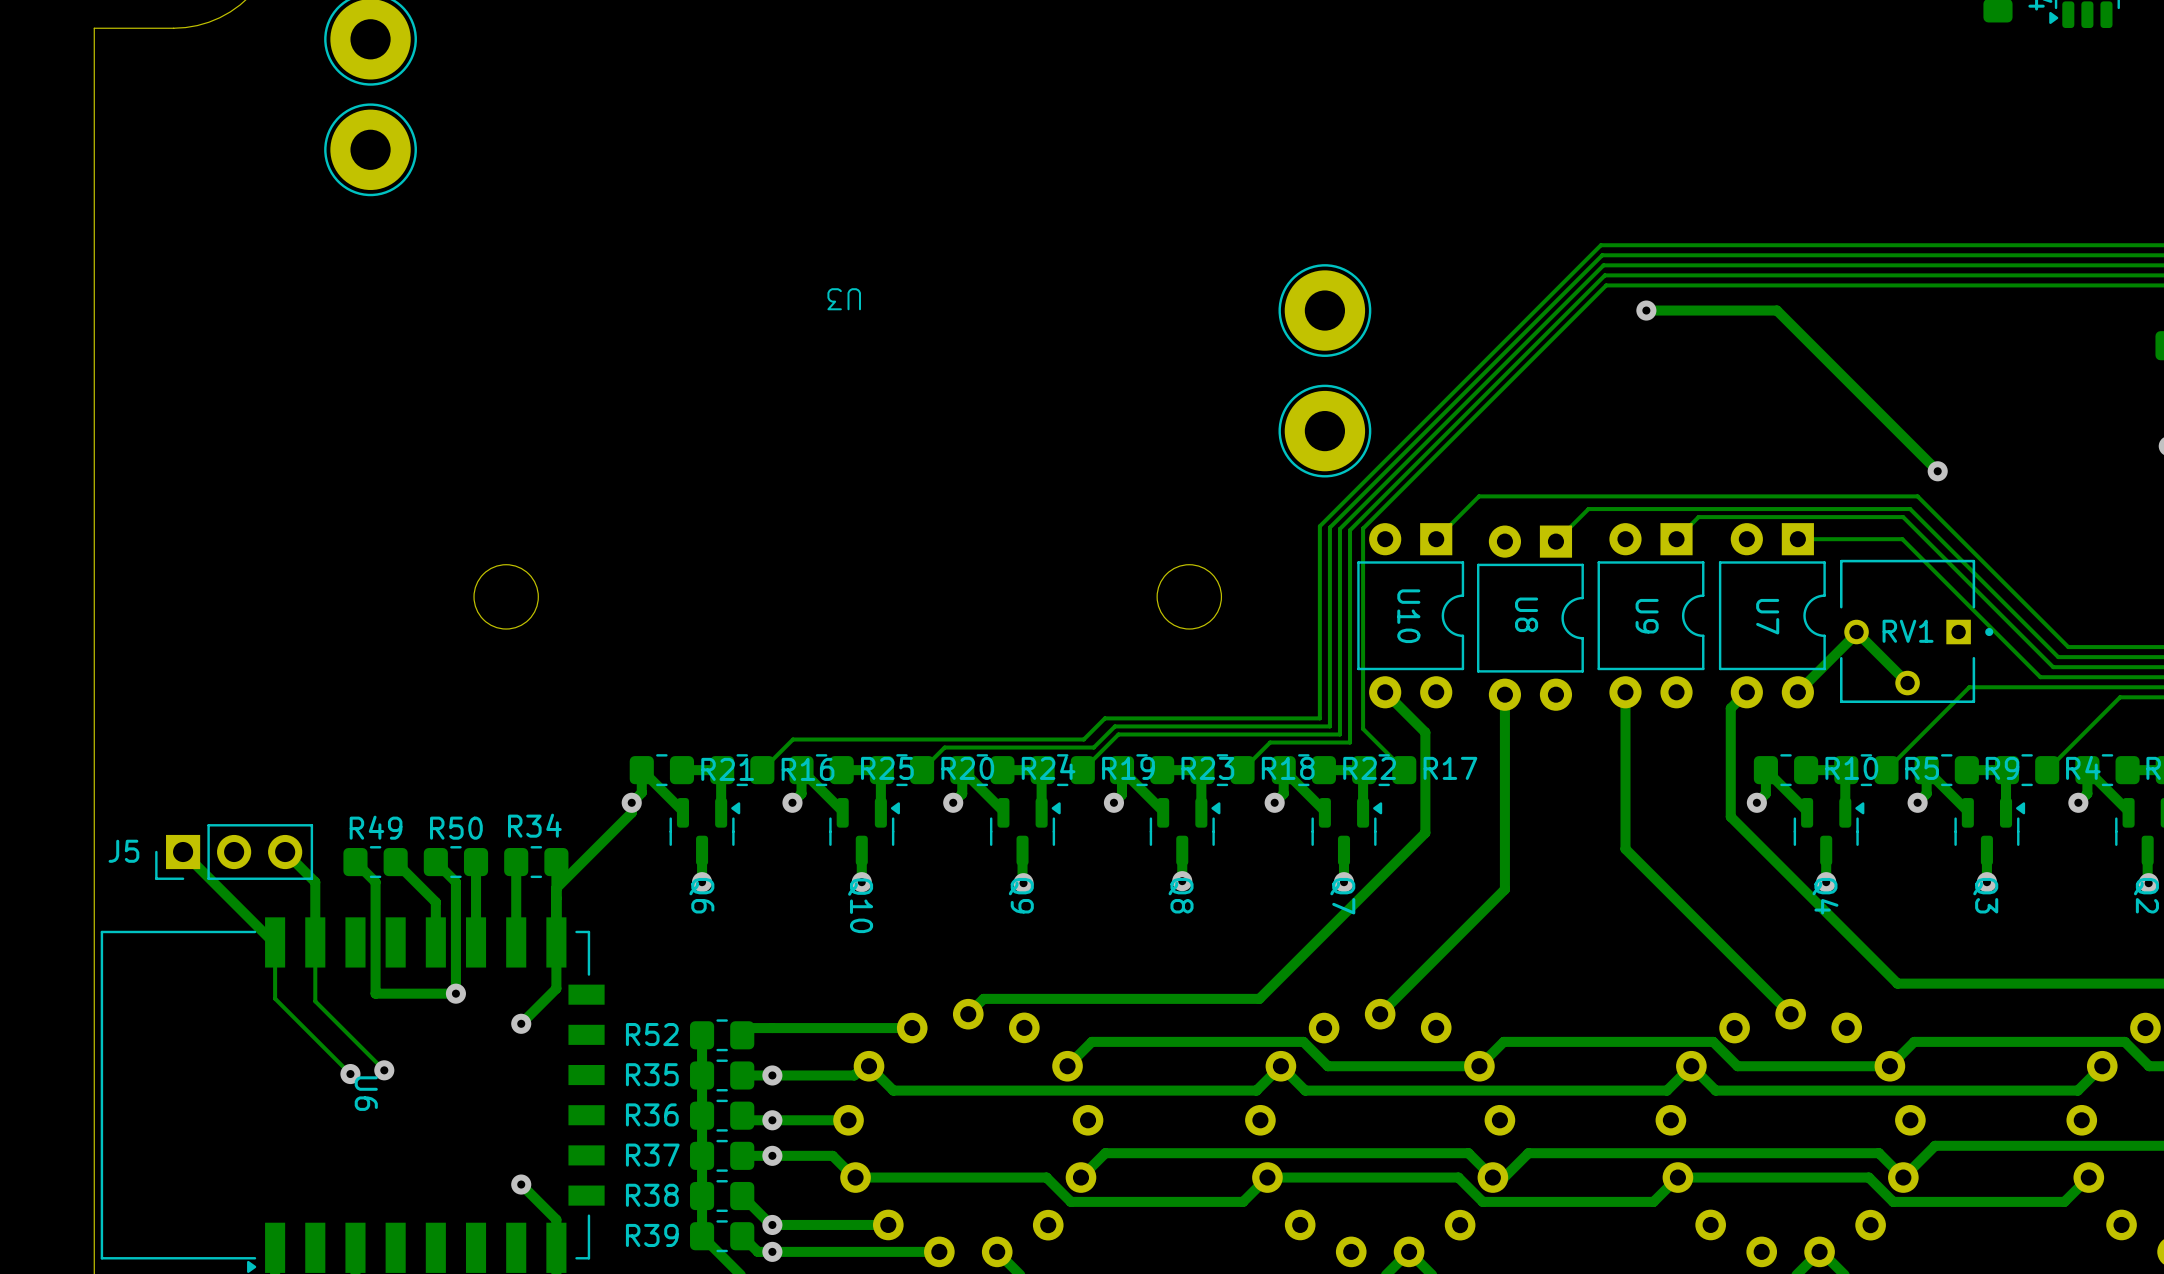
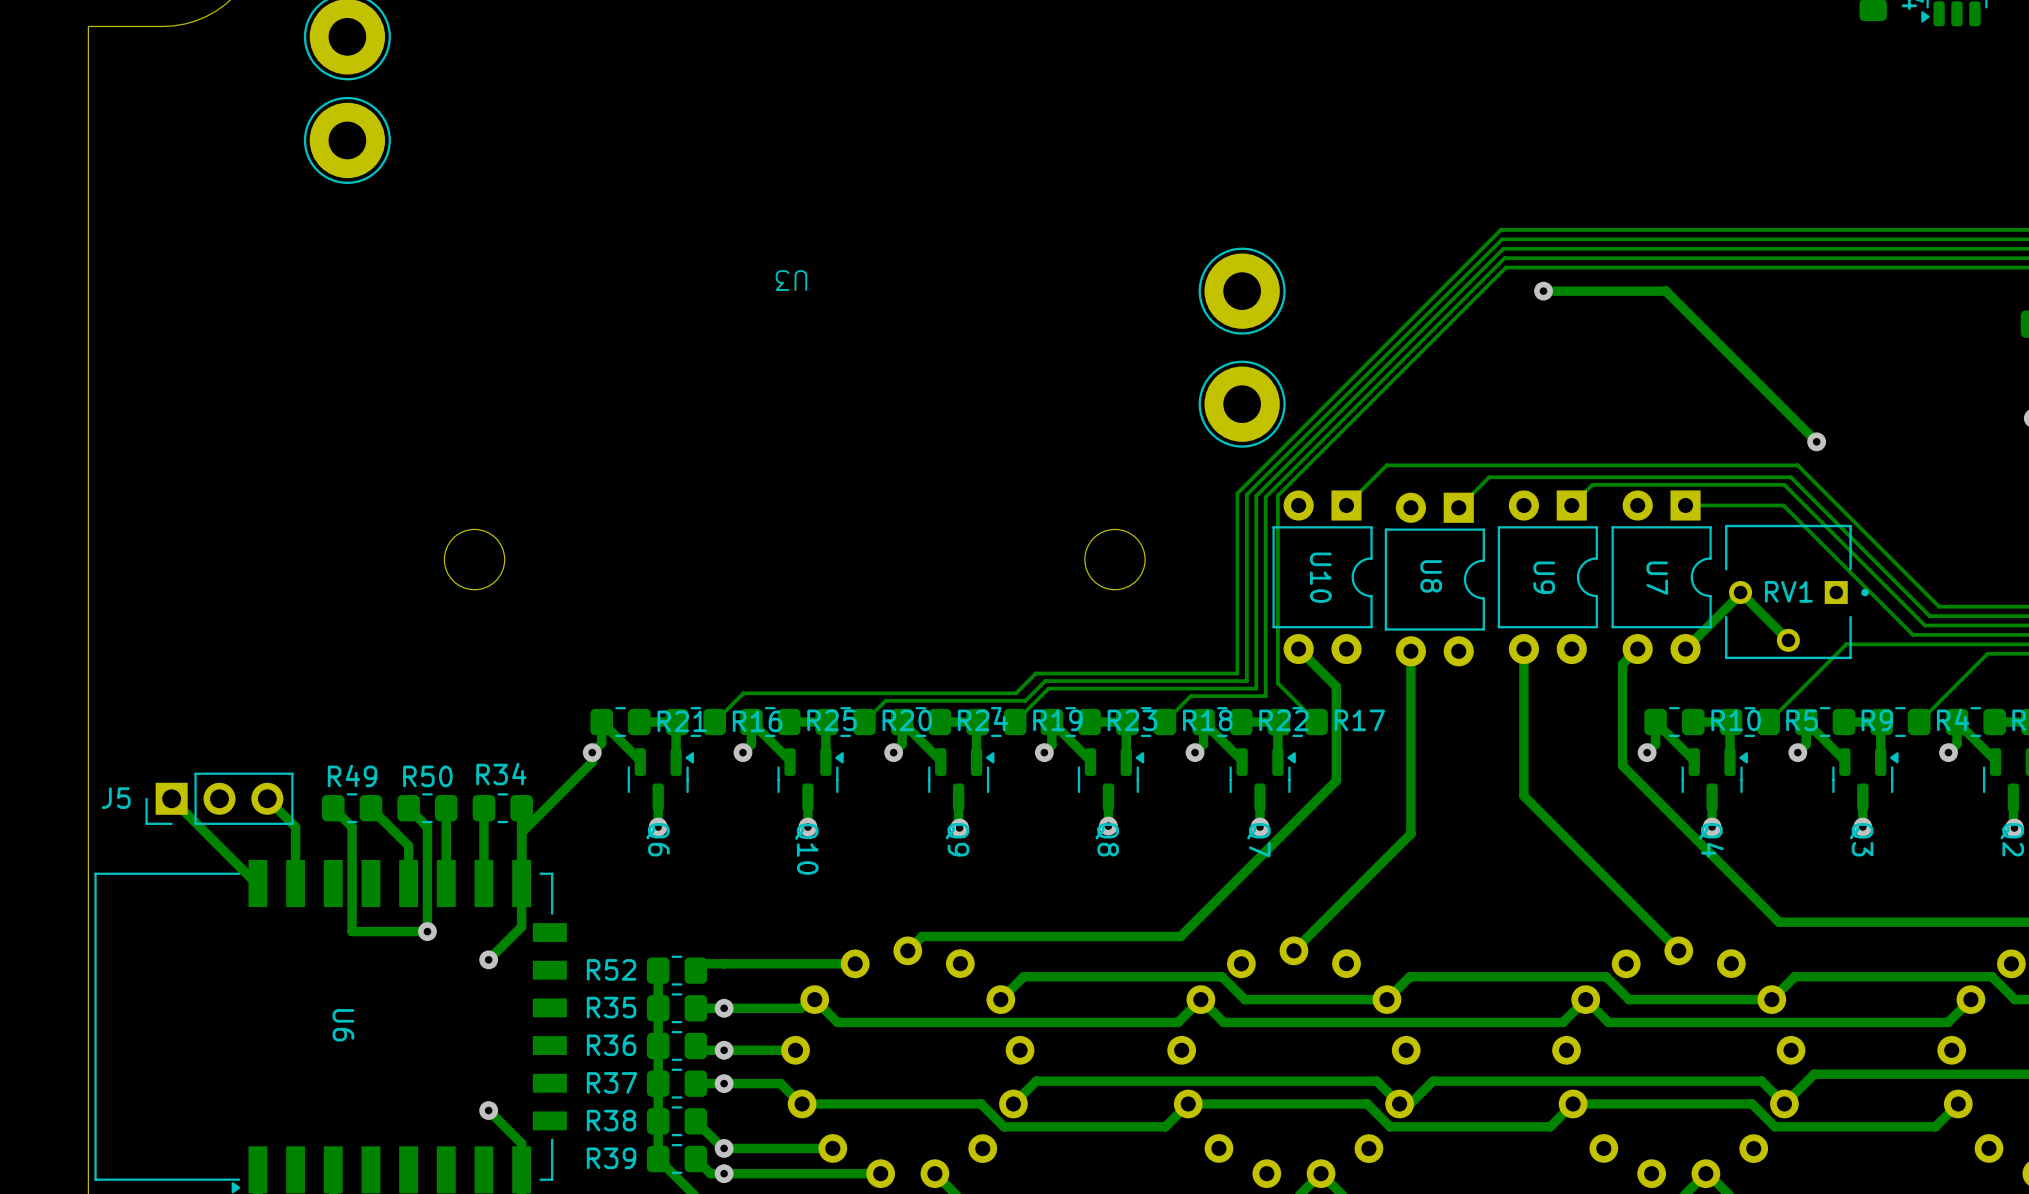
track: (275, 942) (275, 998) (350, 1074) -> none
track: (315, 942) (315, 1001) (384, 1070) -> none
via: (384, 1070) -> none
via: (350, 1074) -> none

